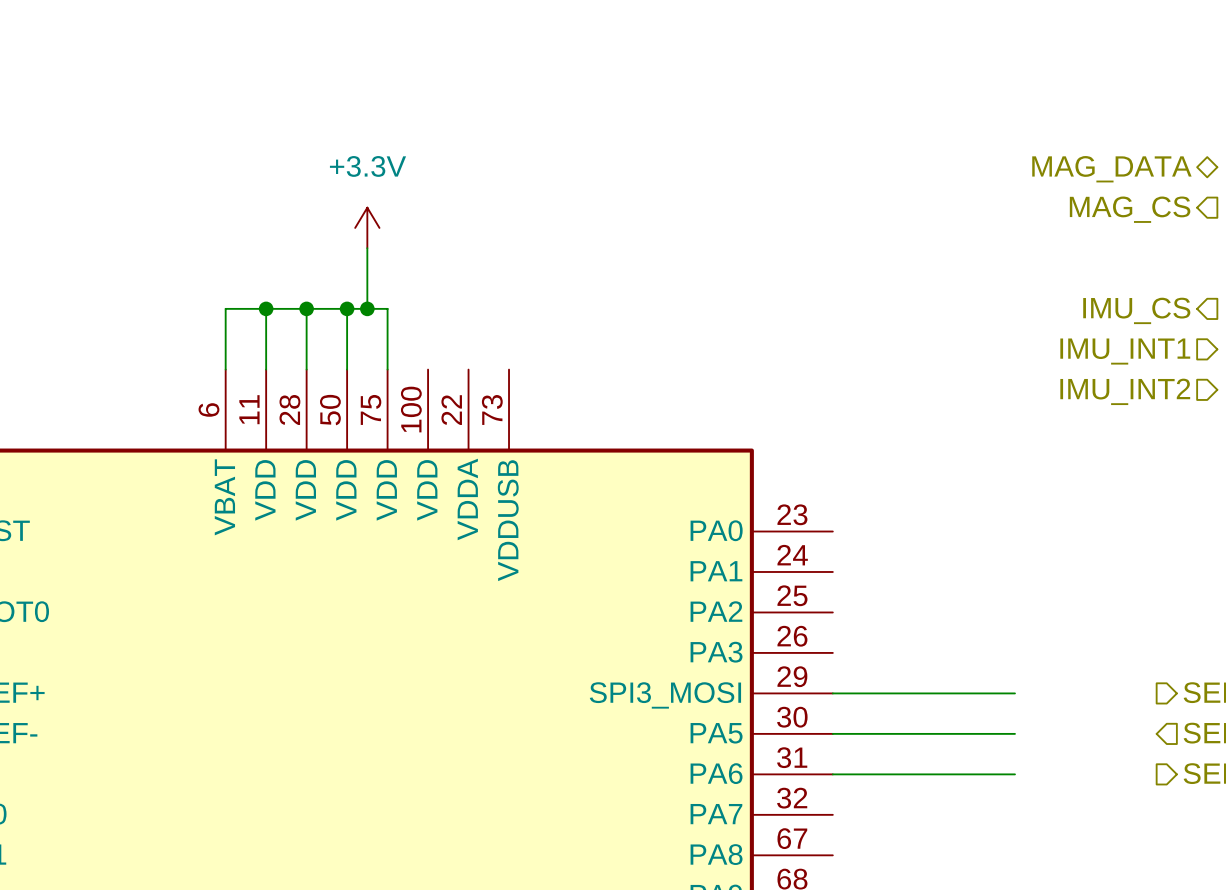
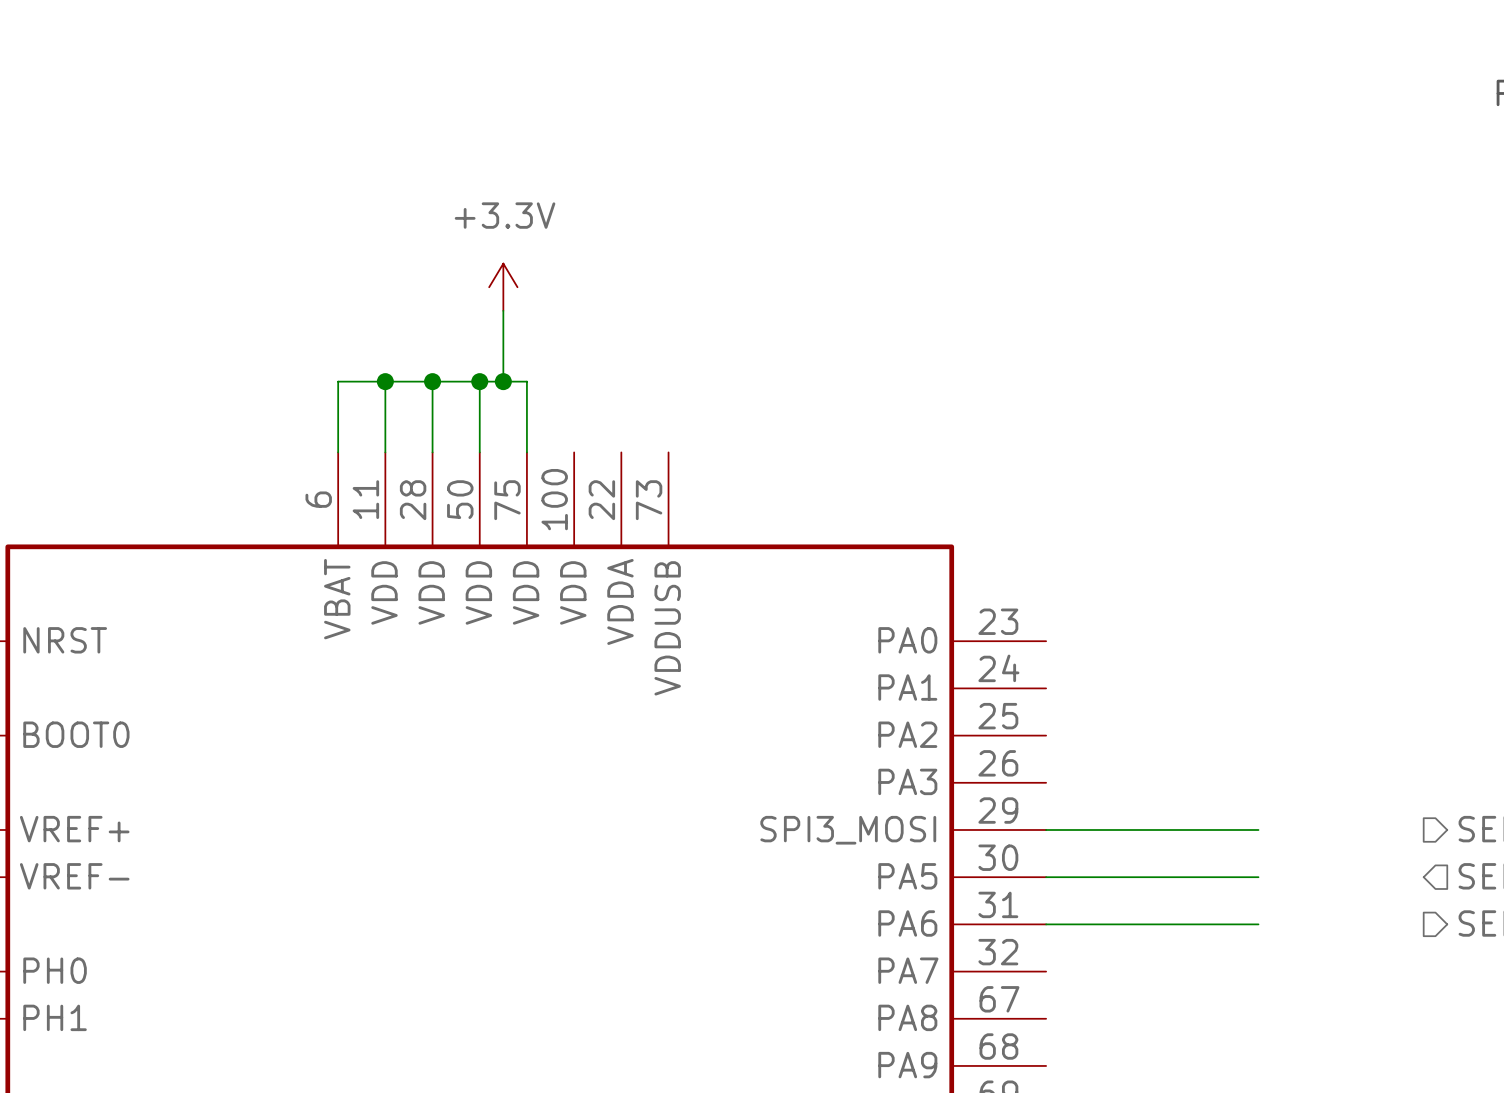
hierarchical label: MAG_DATA (1111, 169) -> none
hierarchical label: MAG_CS (1130, 209) -> none
hierarchical label: IMU_CS (1136, 310) -> none
hierarchical label: IMU_INT1 (1125, 351) -> none
hierarchical label: IMU_INT2 (1125, 391) -> none

